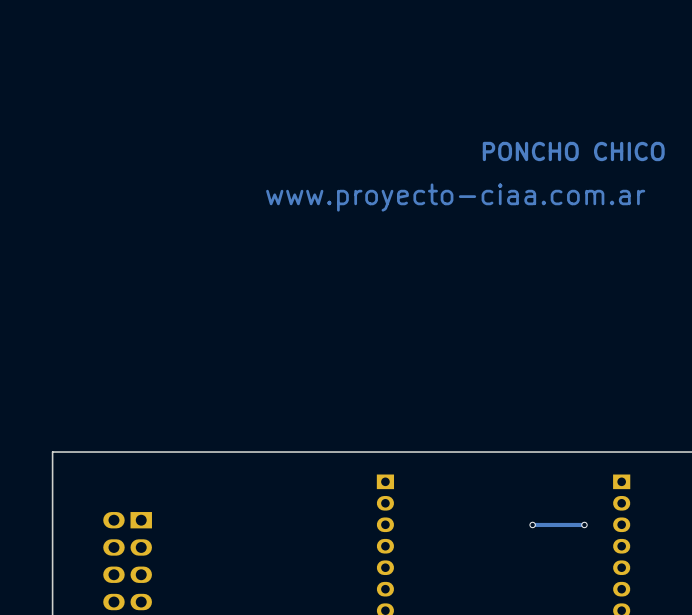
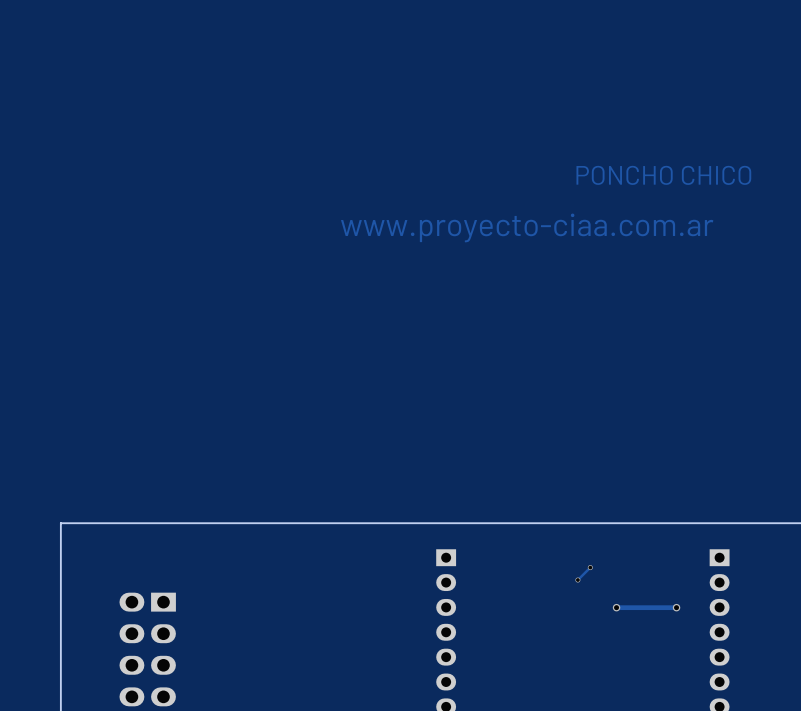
track: none -> (590, 567) (577, 580)
via: none -> (590, 567)
via: none -> (577, 580)

